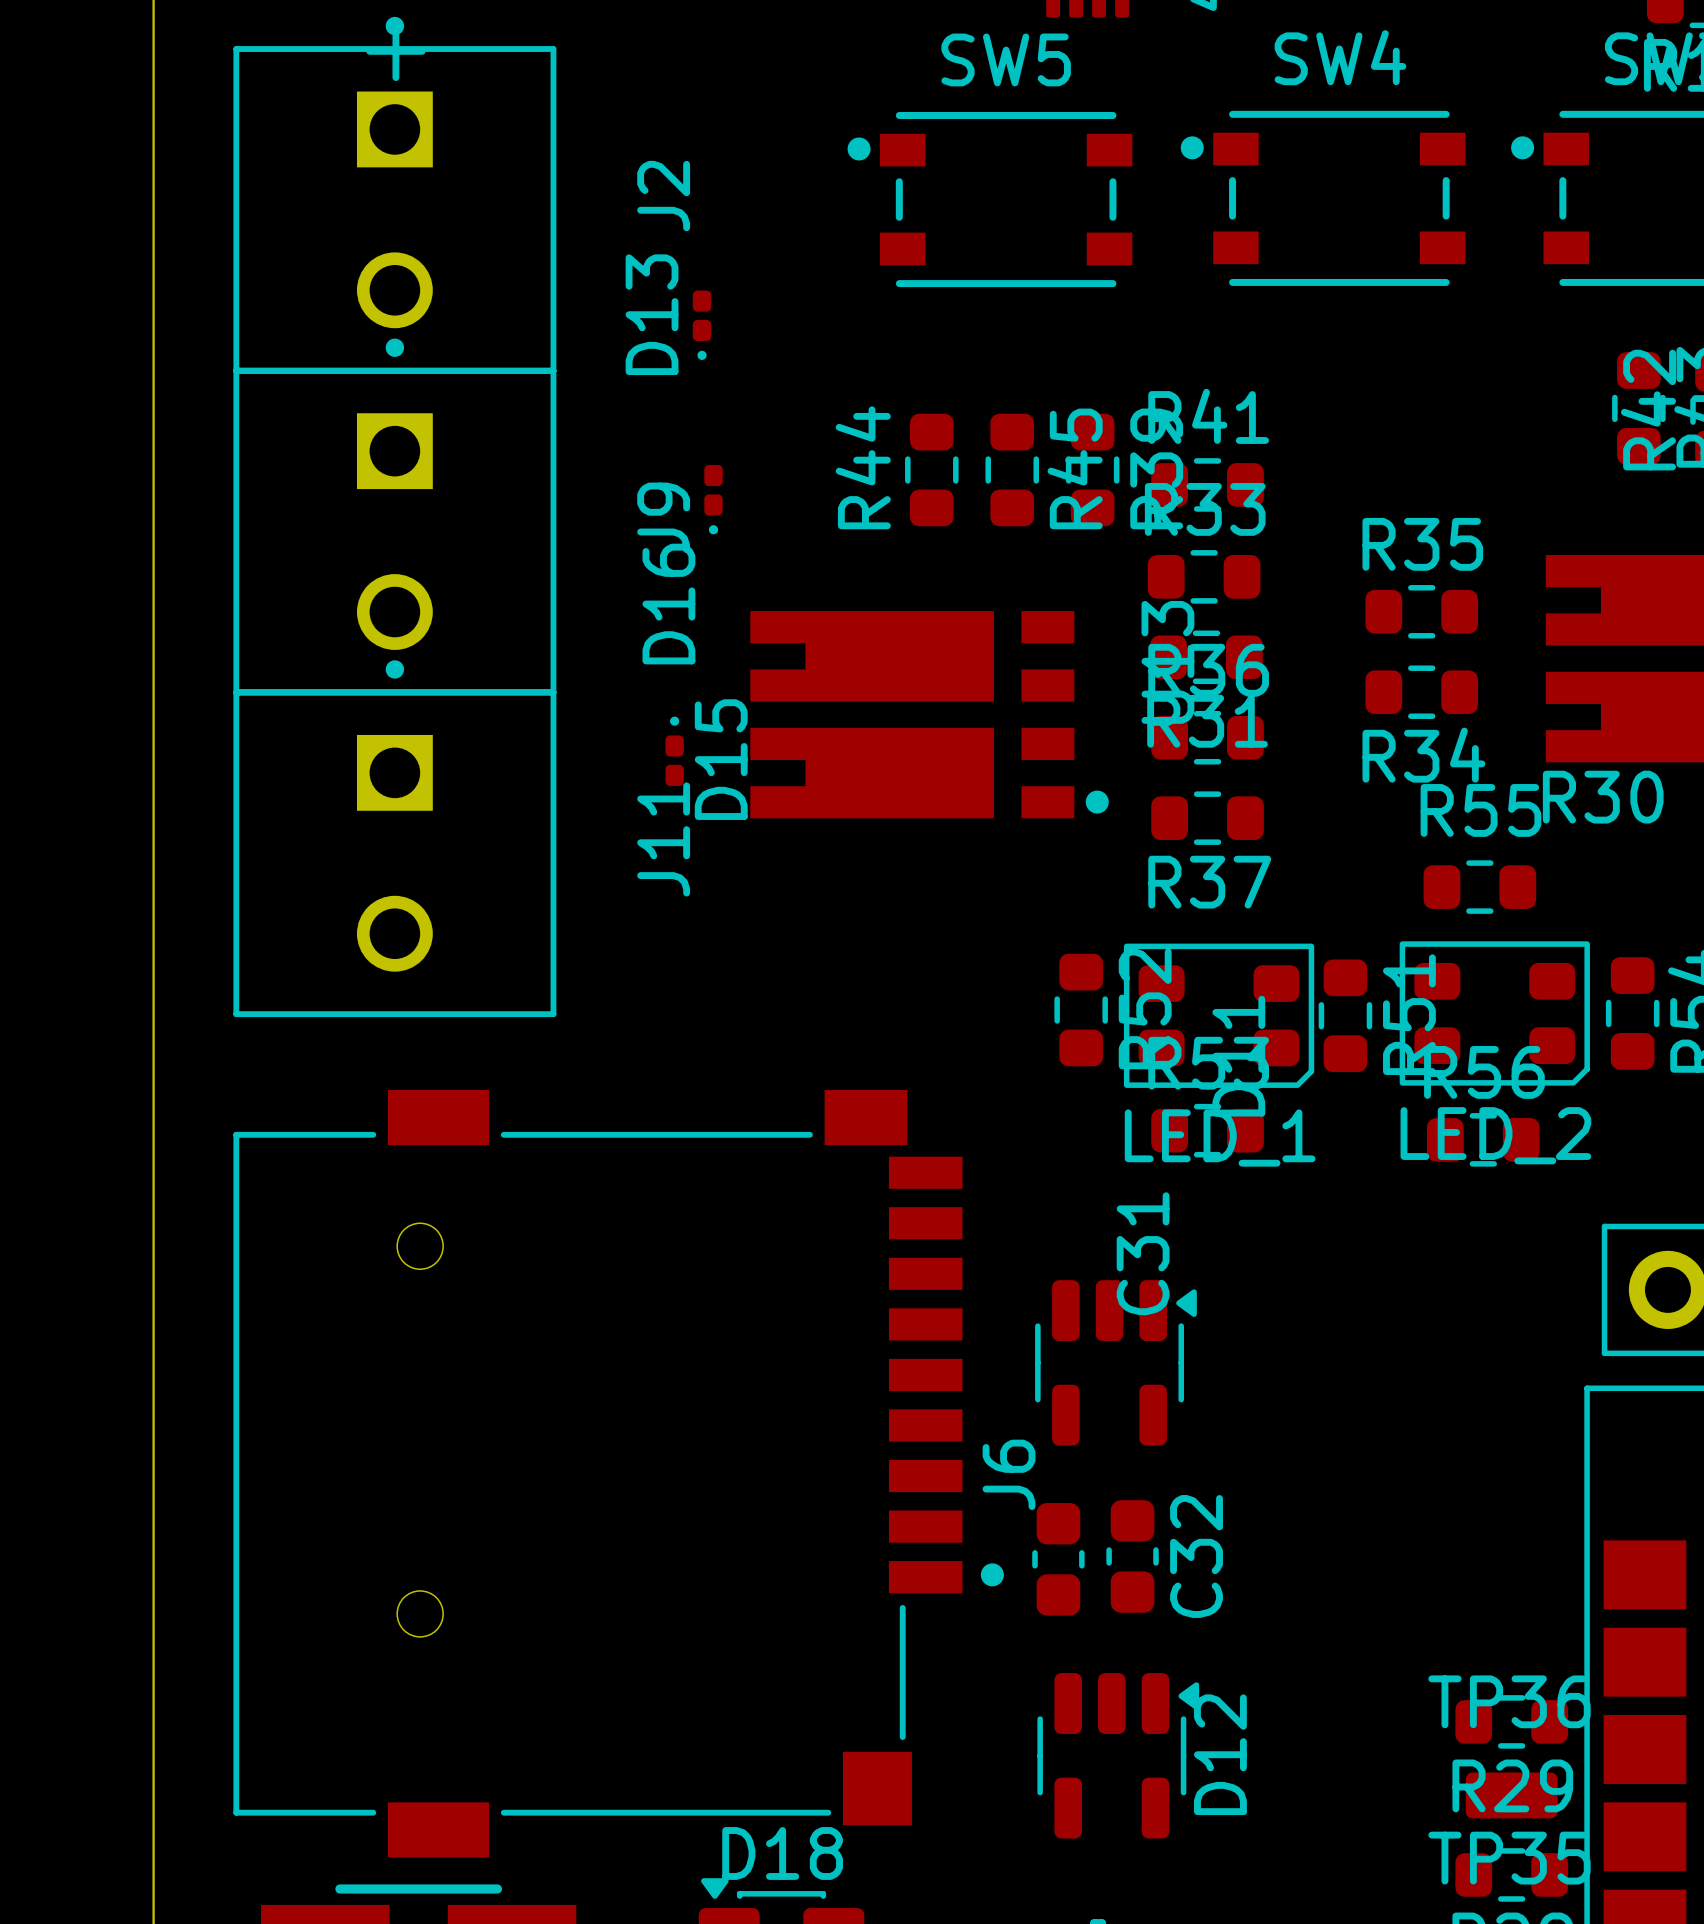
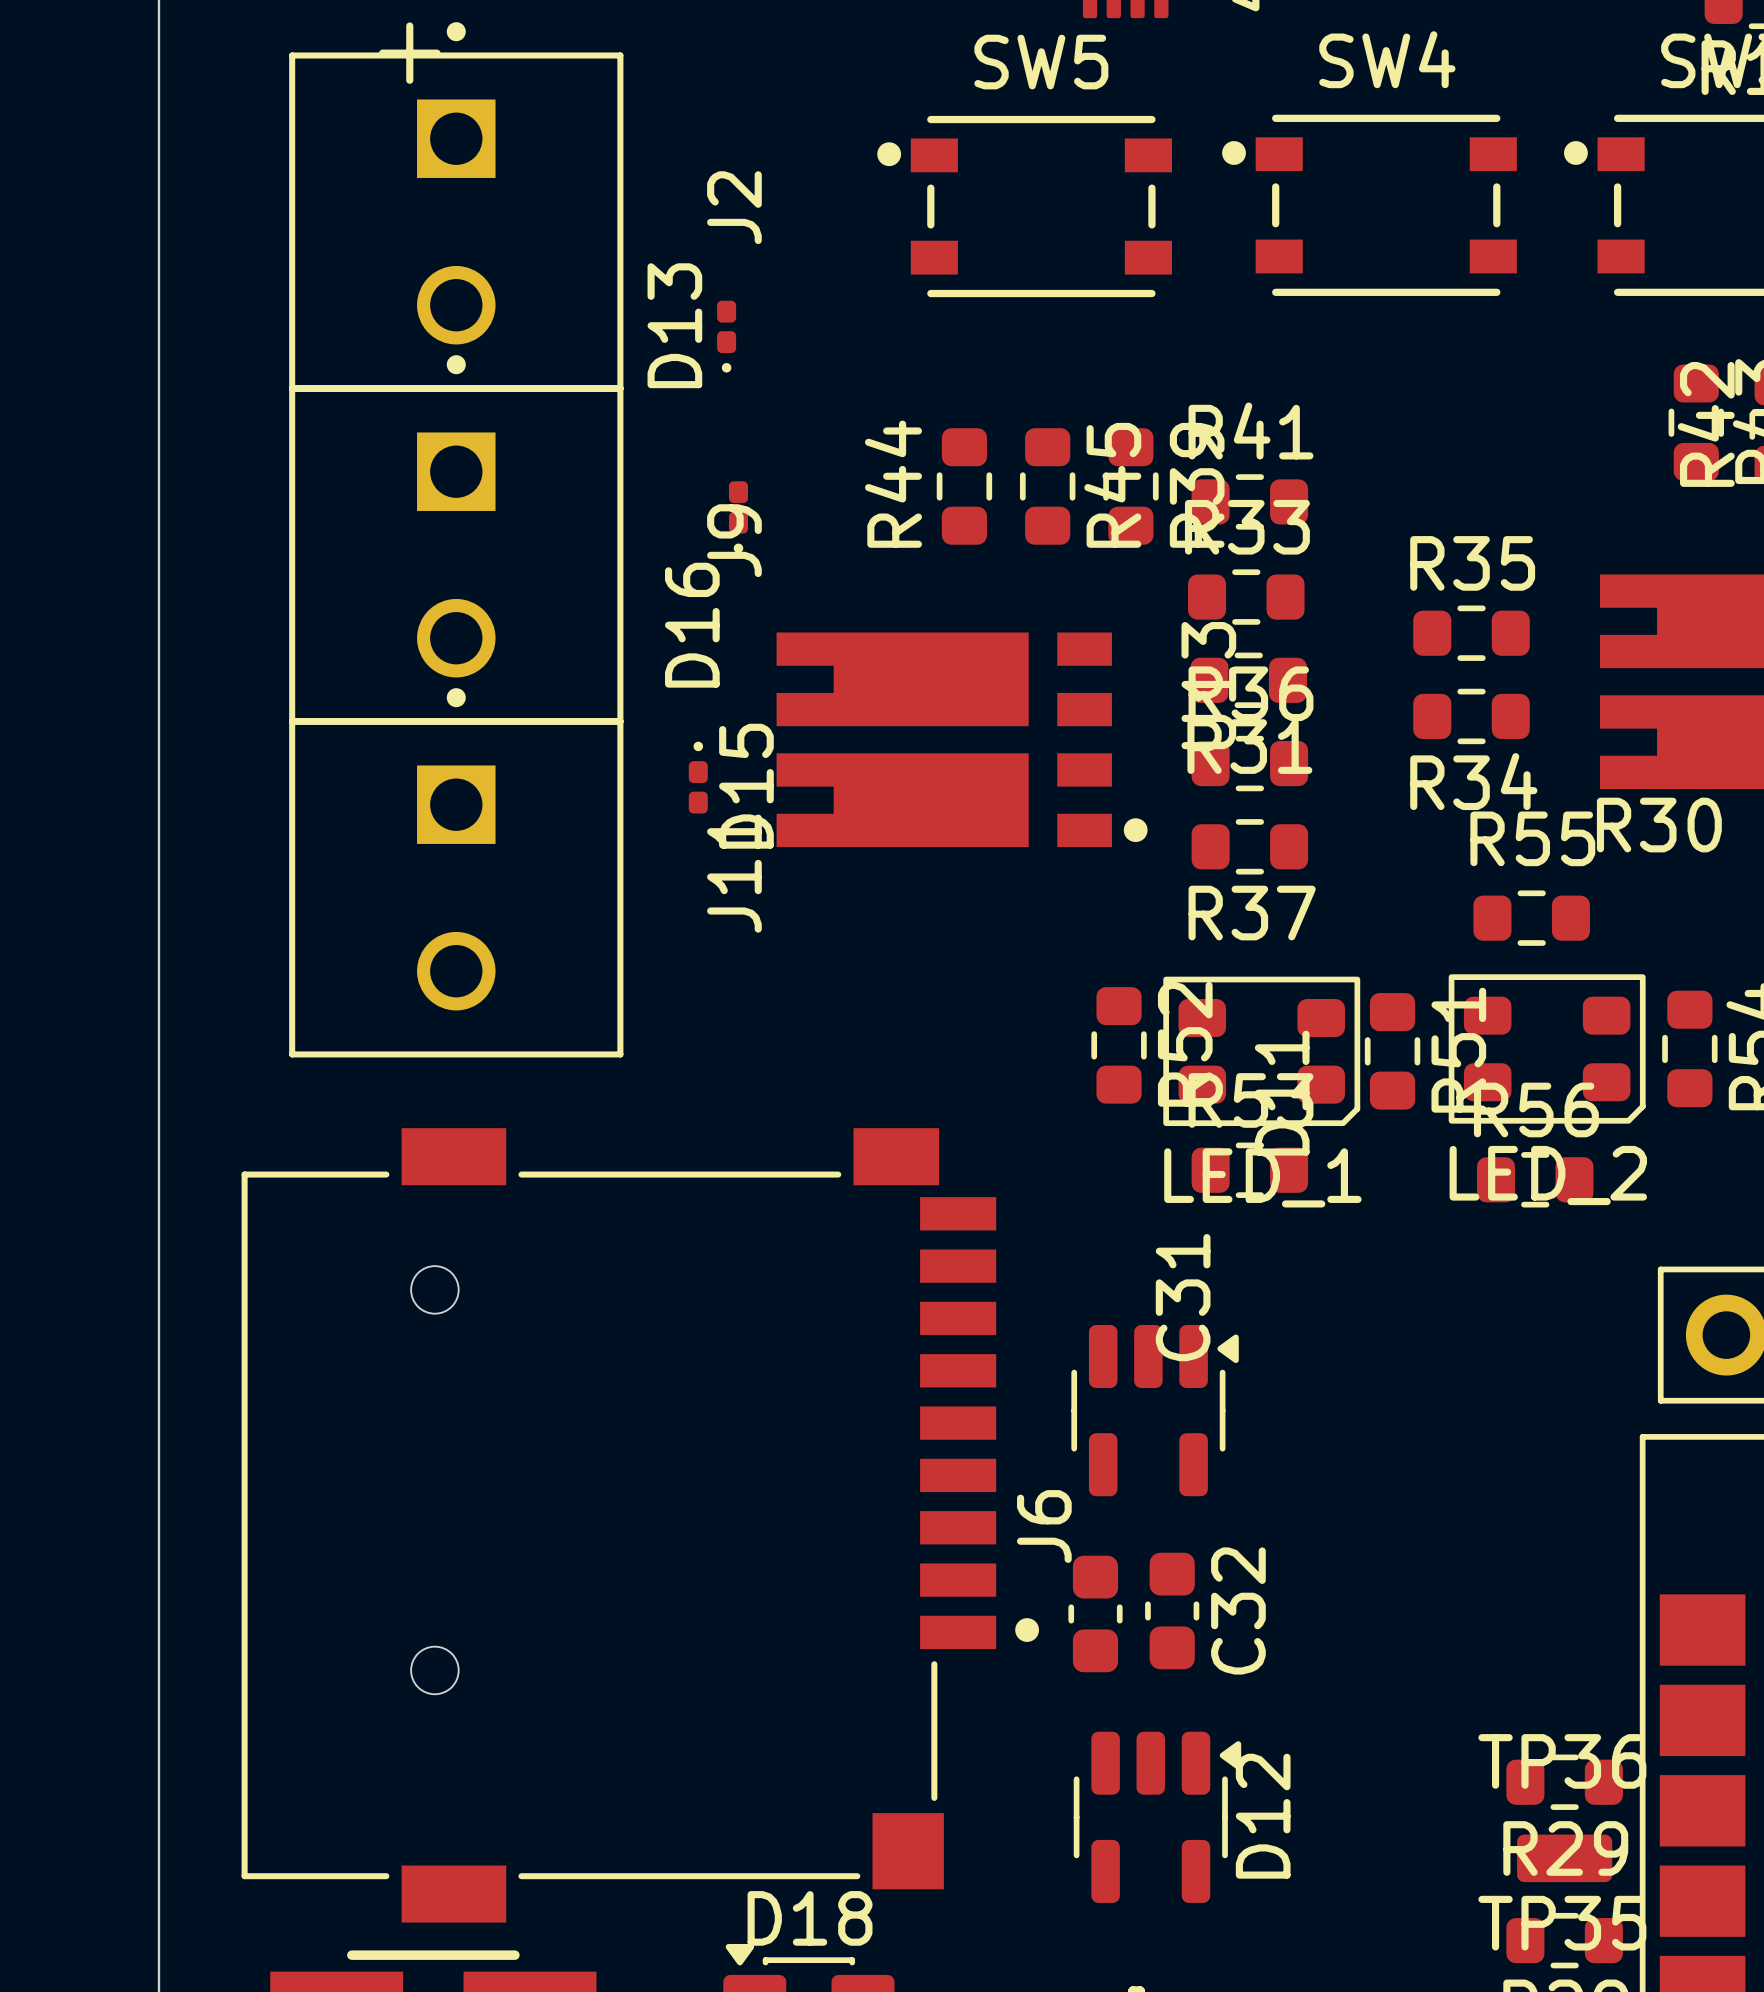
J2 position: (394, 195) -> (456, 206)
J9 position: (394, 516) -> (456, 539)
J11 position: (394, 838) -> (456, 872)

